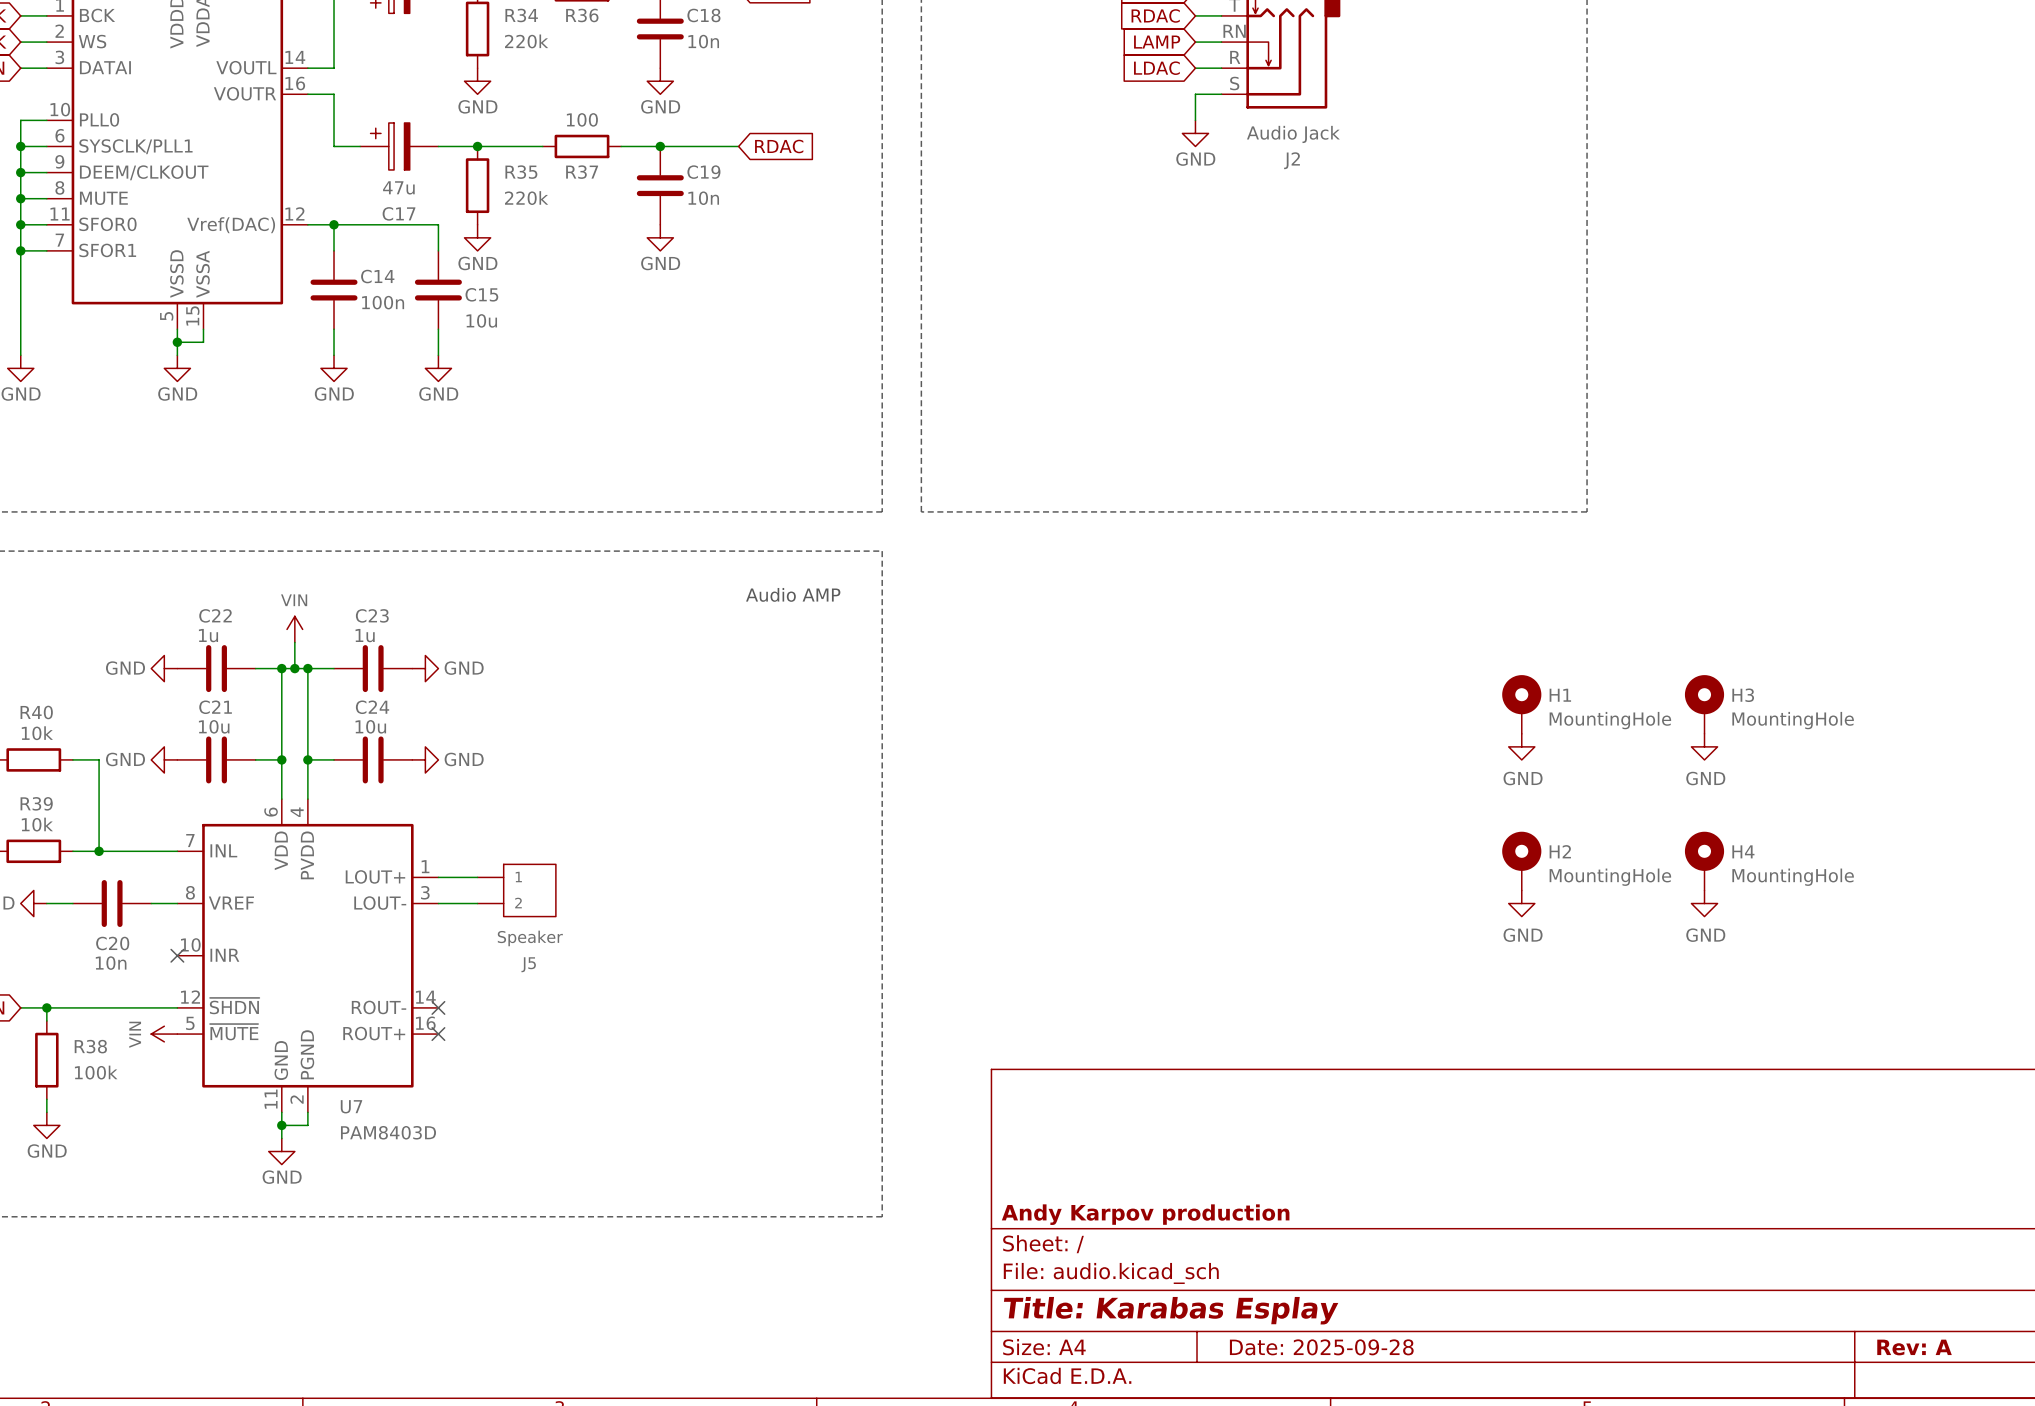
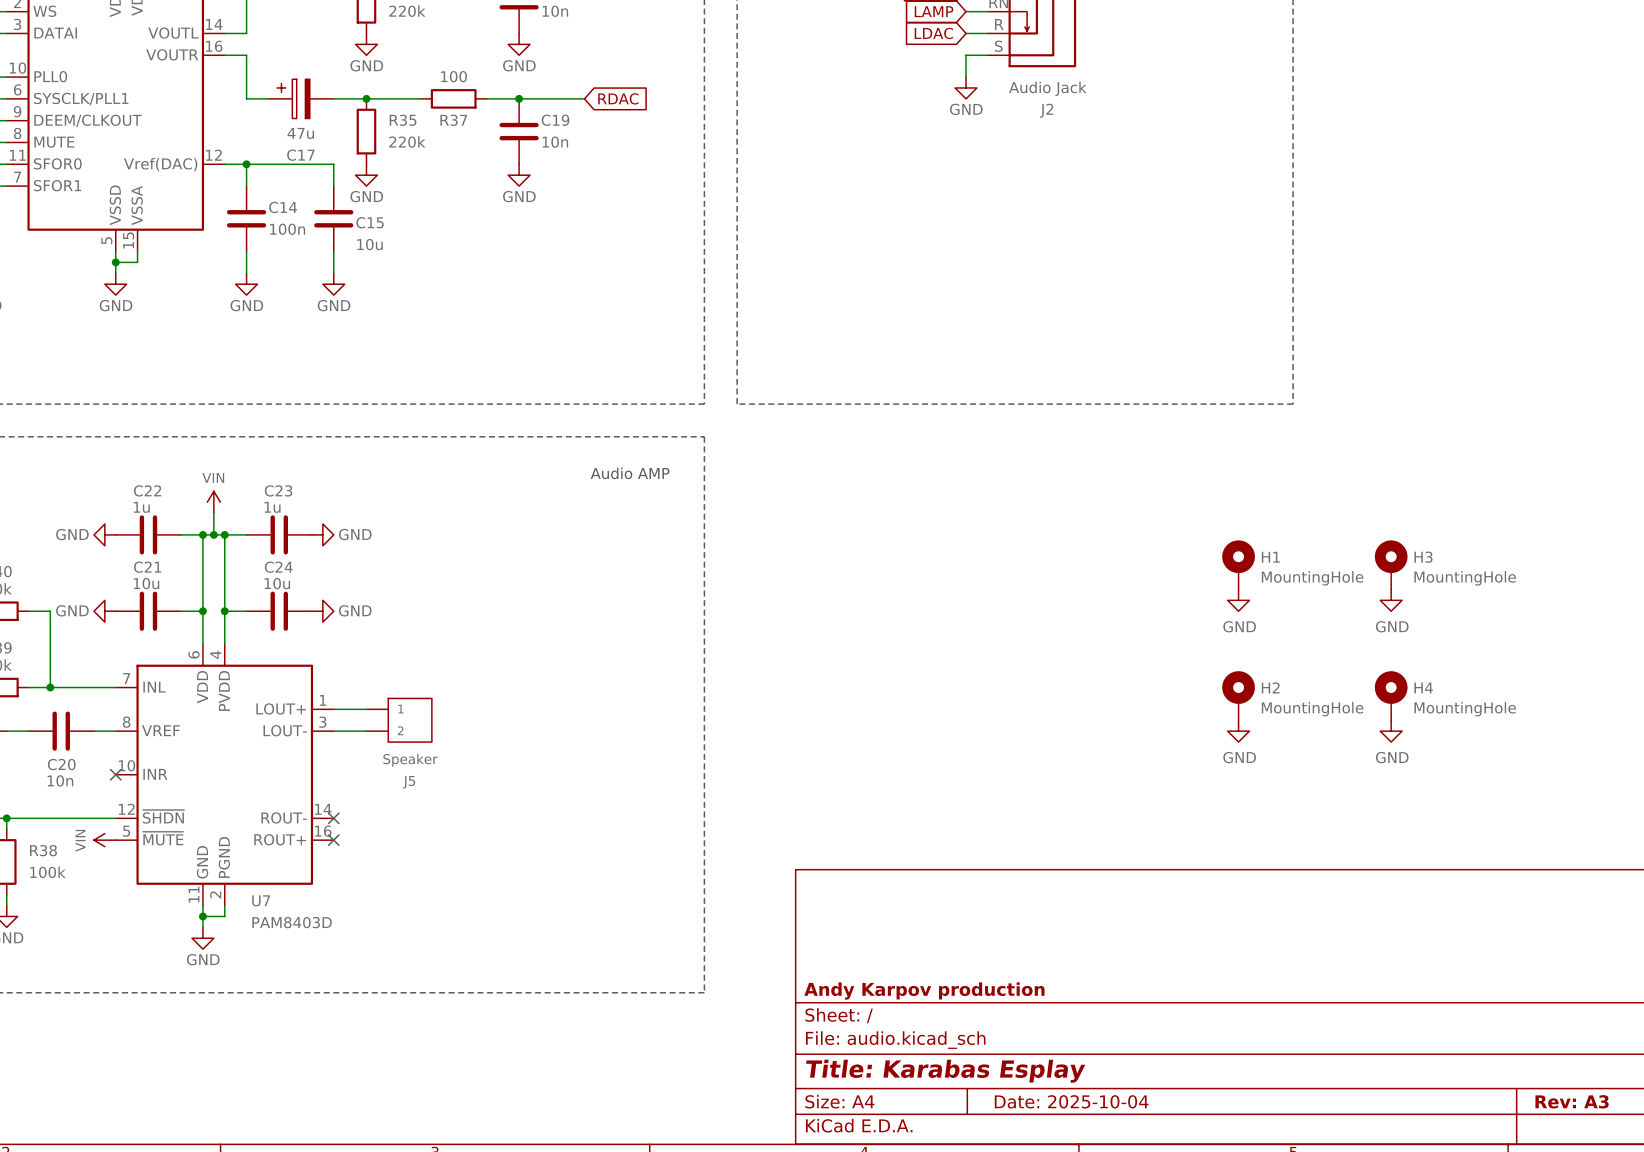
title block: Date: 2025-09-28 (1321, 1347) -> Date: 2025-10-04 (1071, 1101)
title block: Rev: A (1914, 1347) -> Rev: A3 (1572, 1101)

